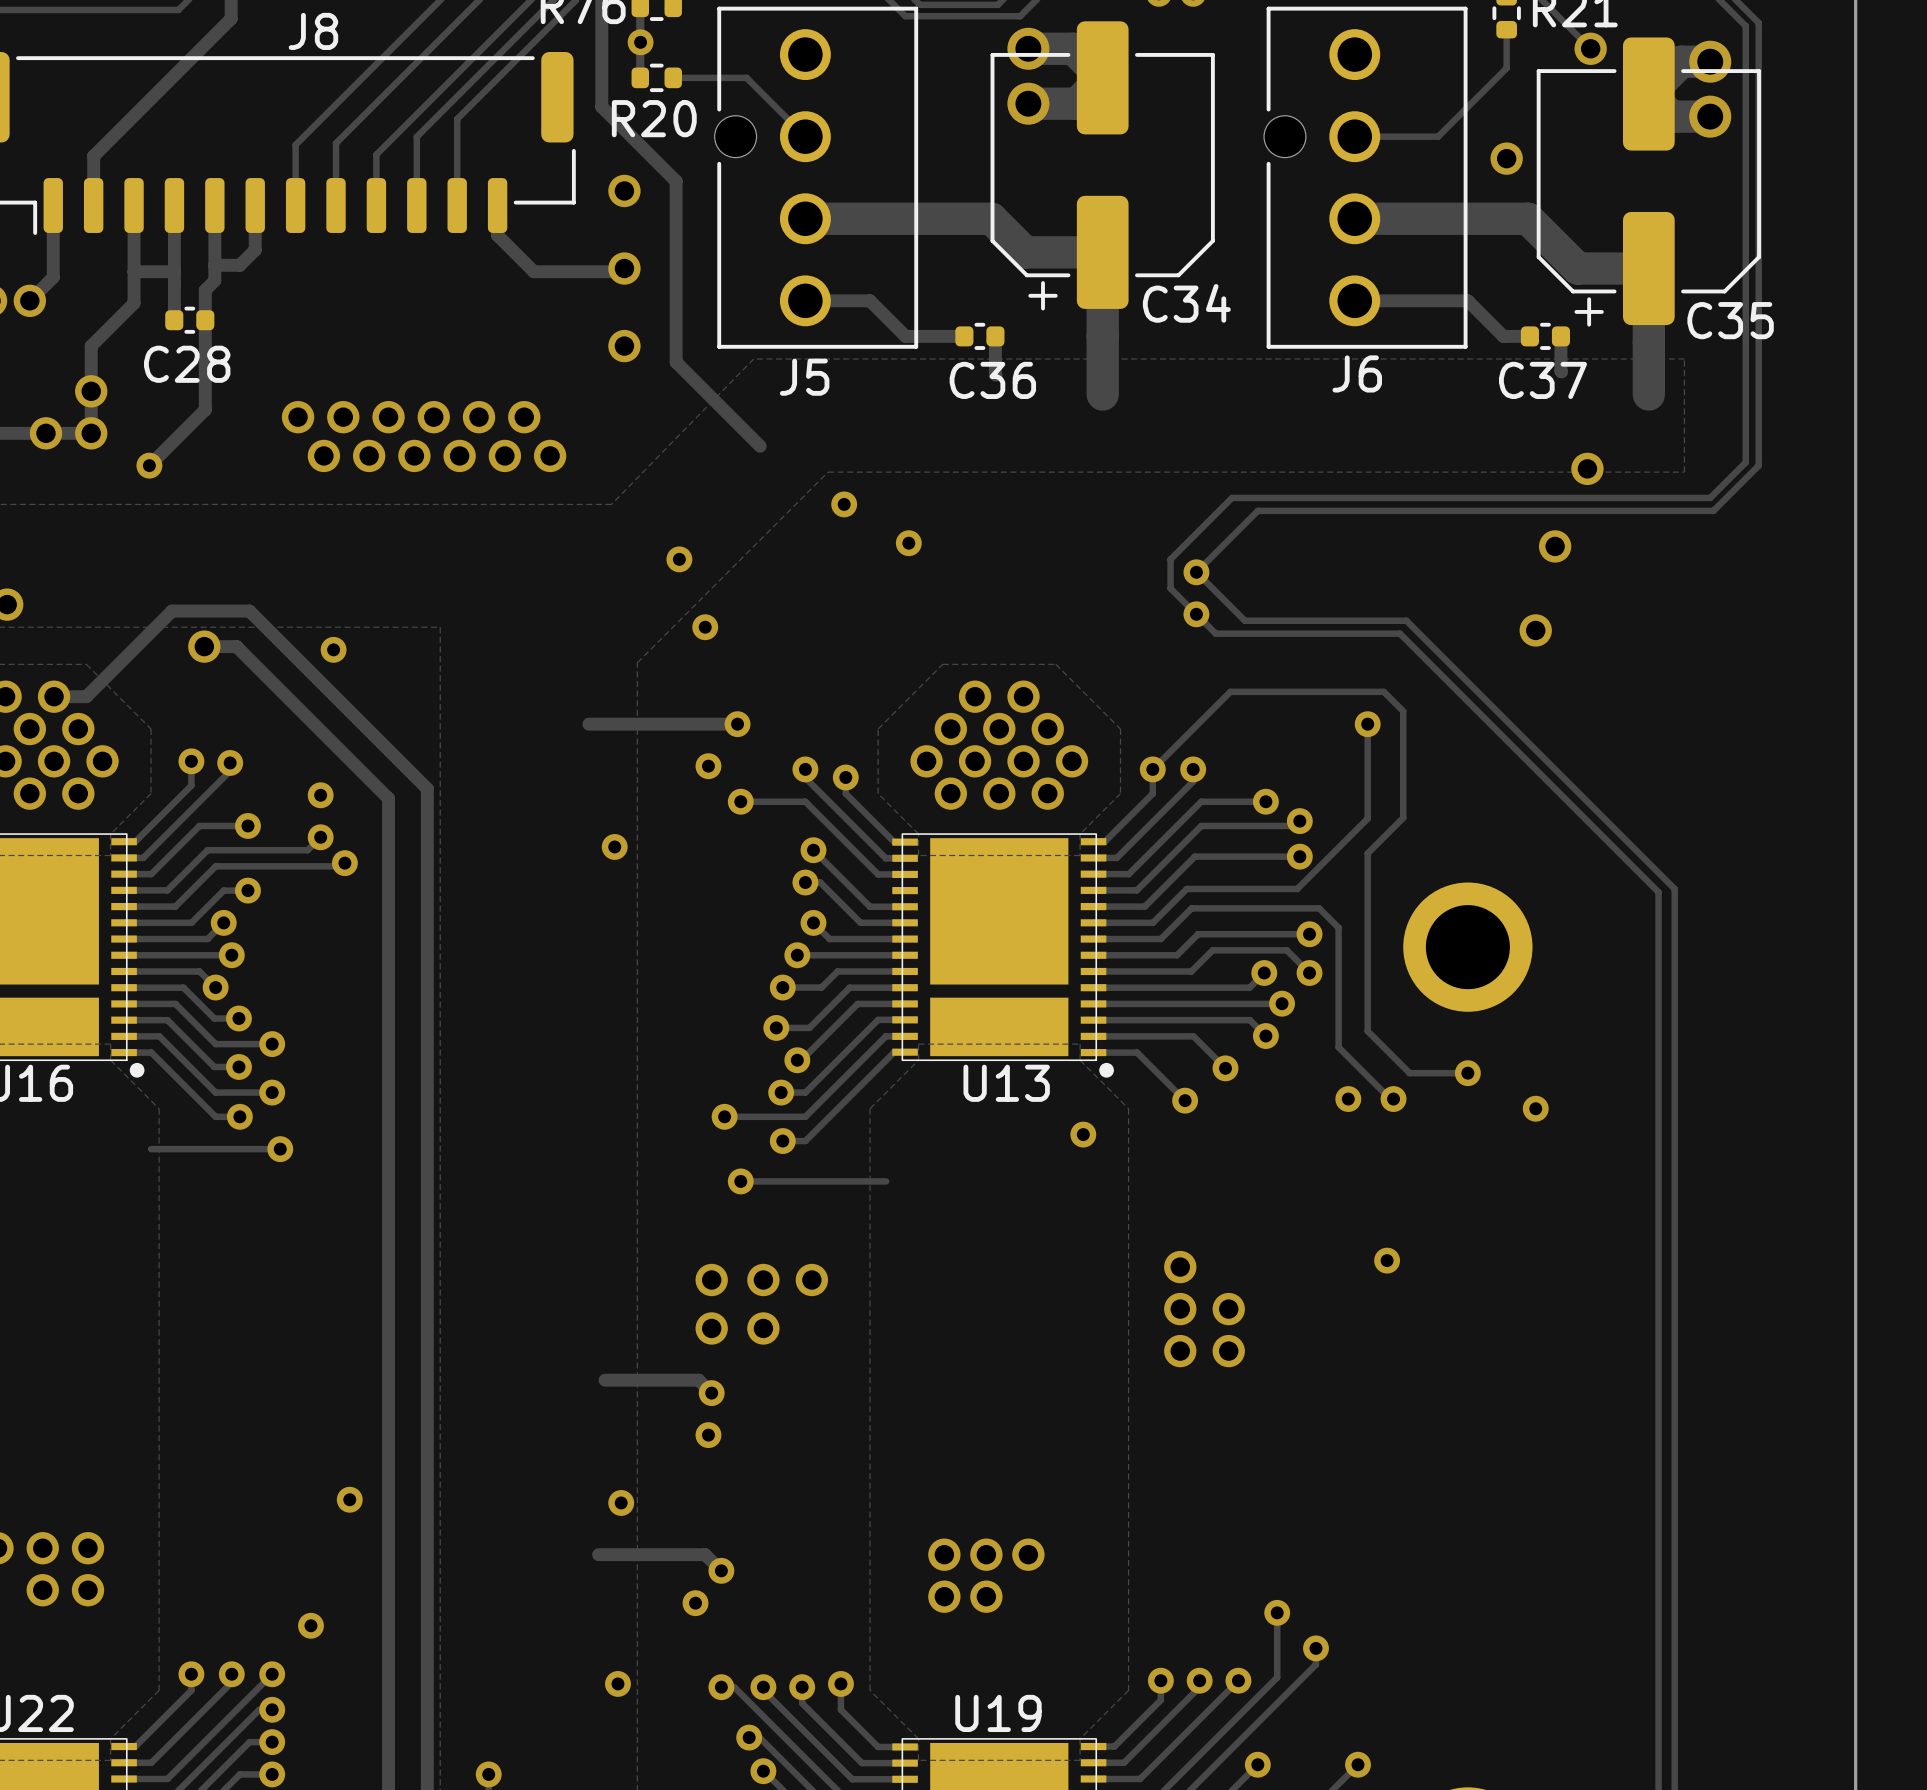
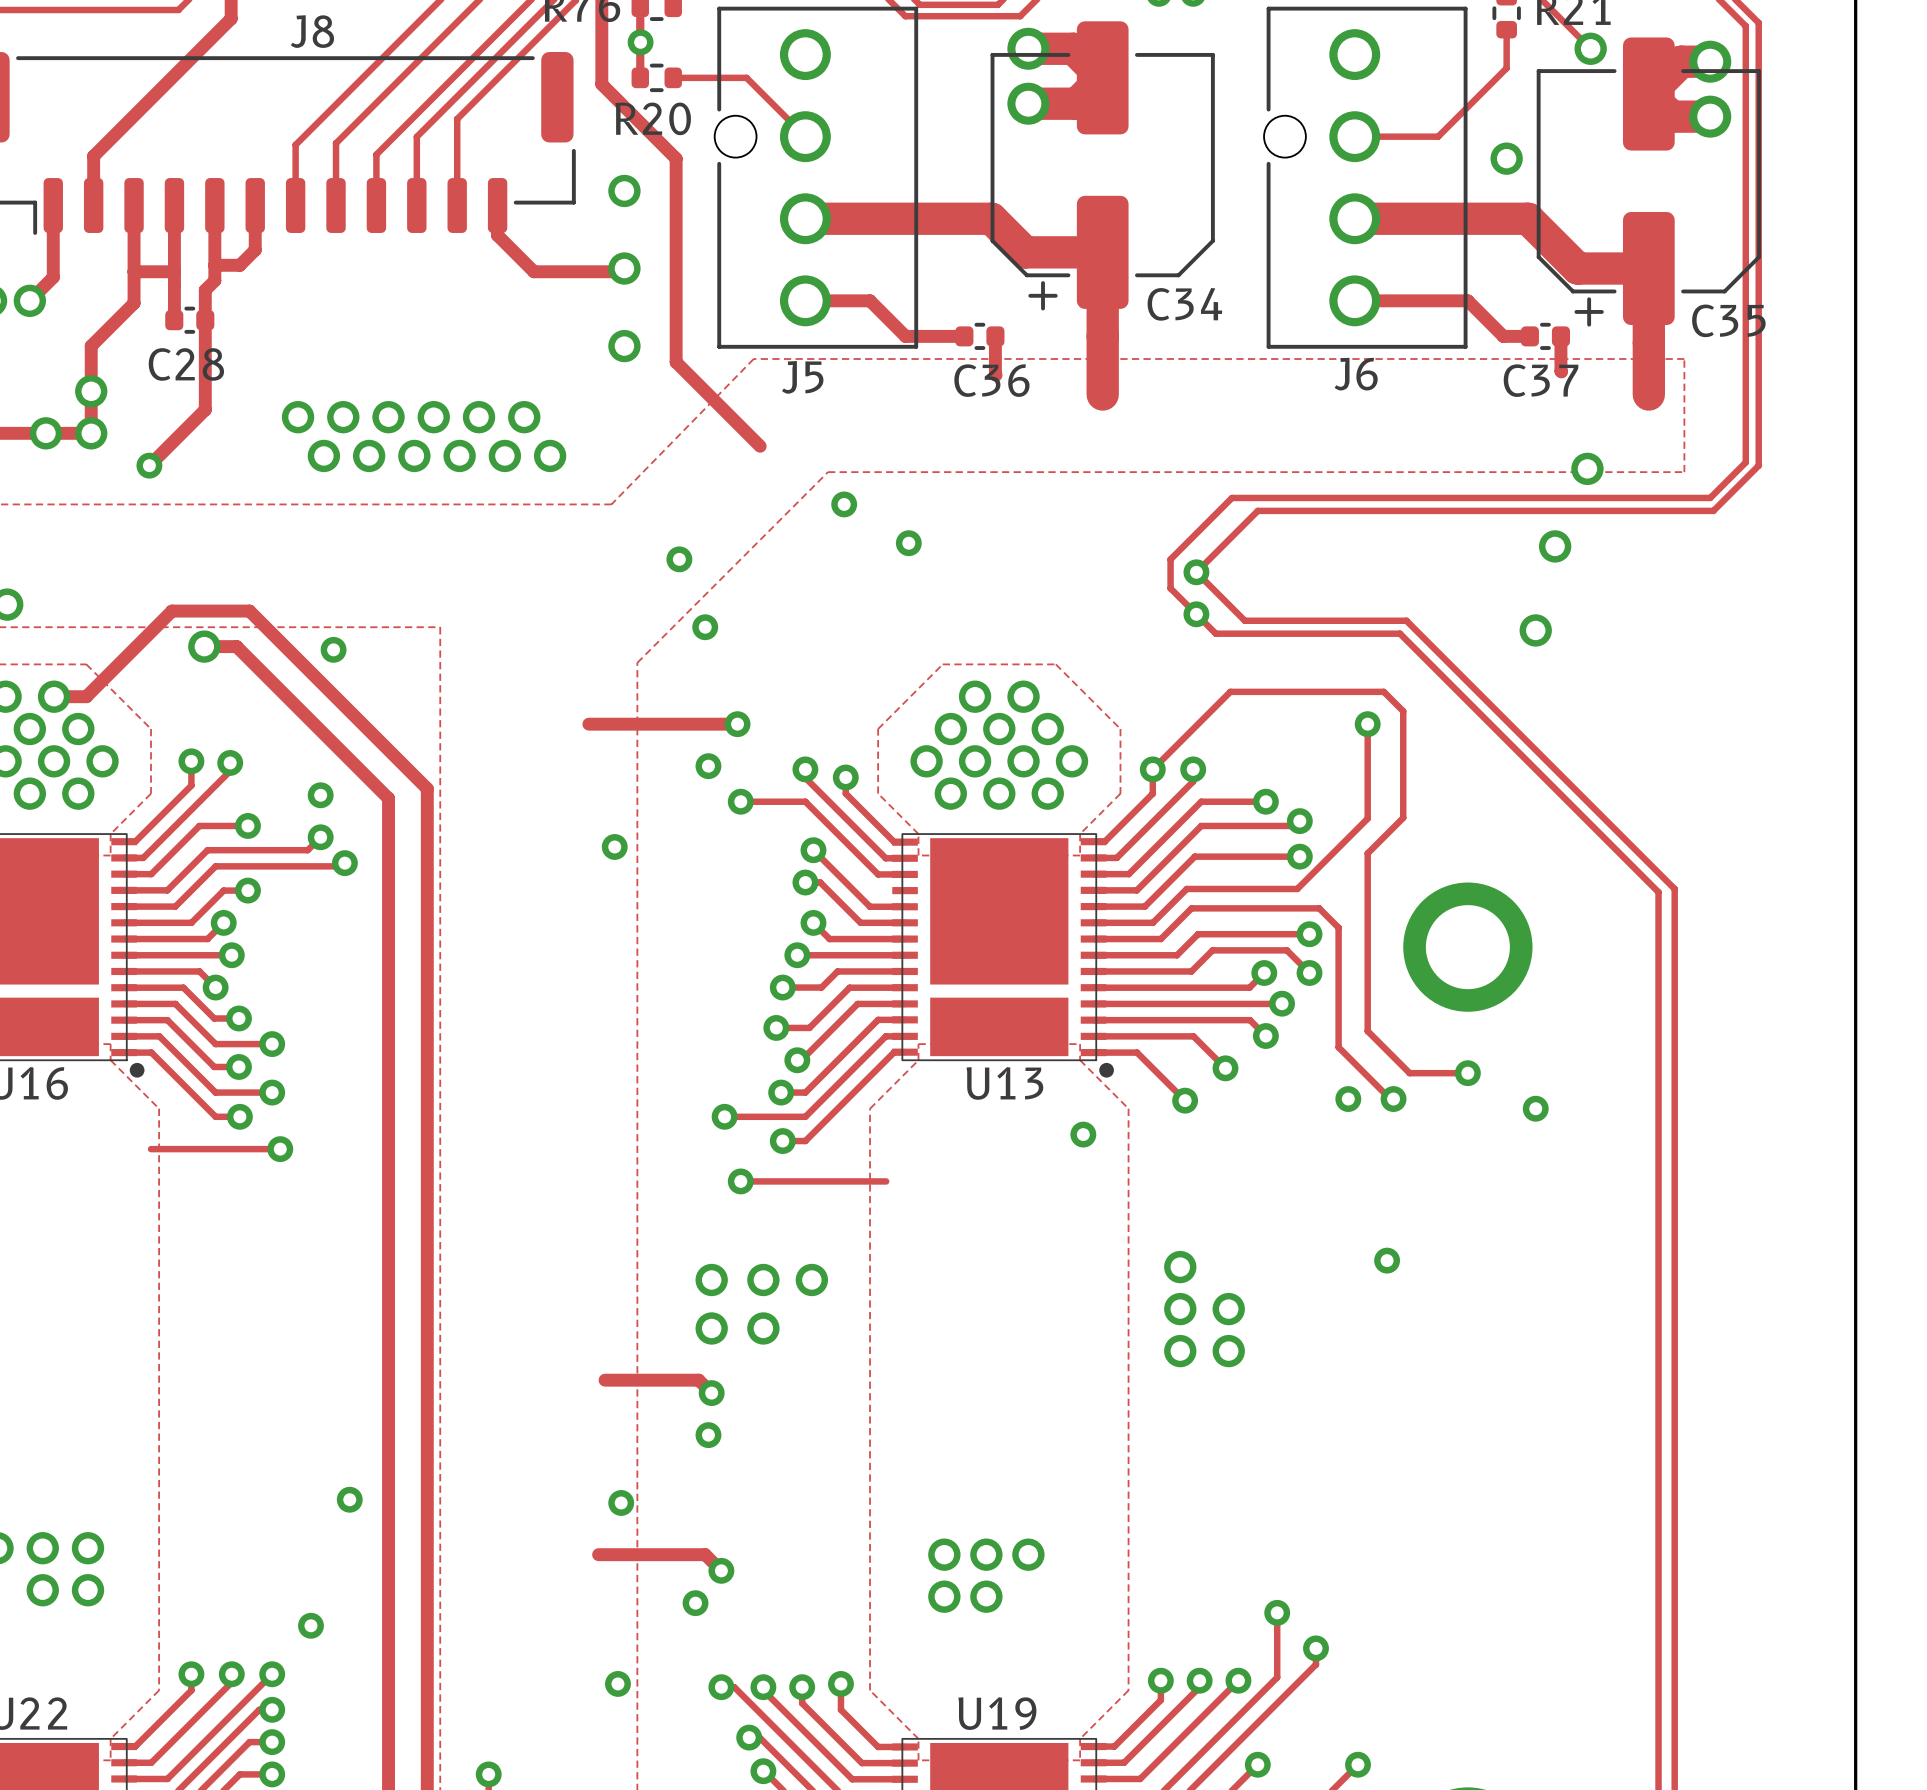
track: (601, 84) (601, 106) (676, 181) -> (601, 84) (676, 158) (676, 181)

